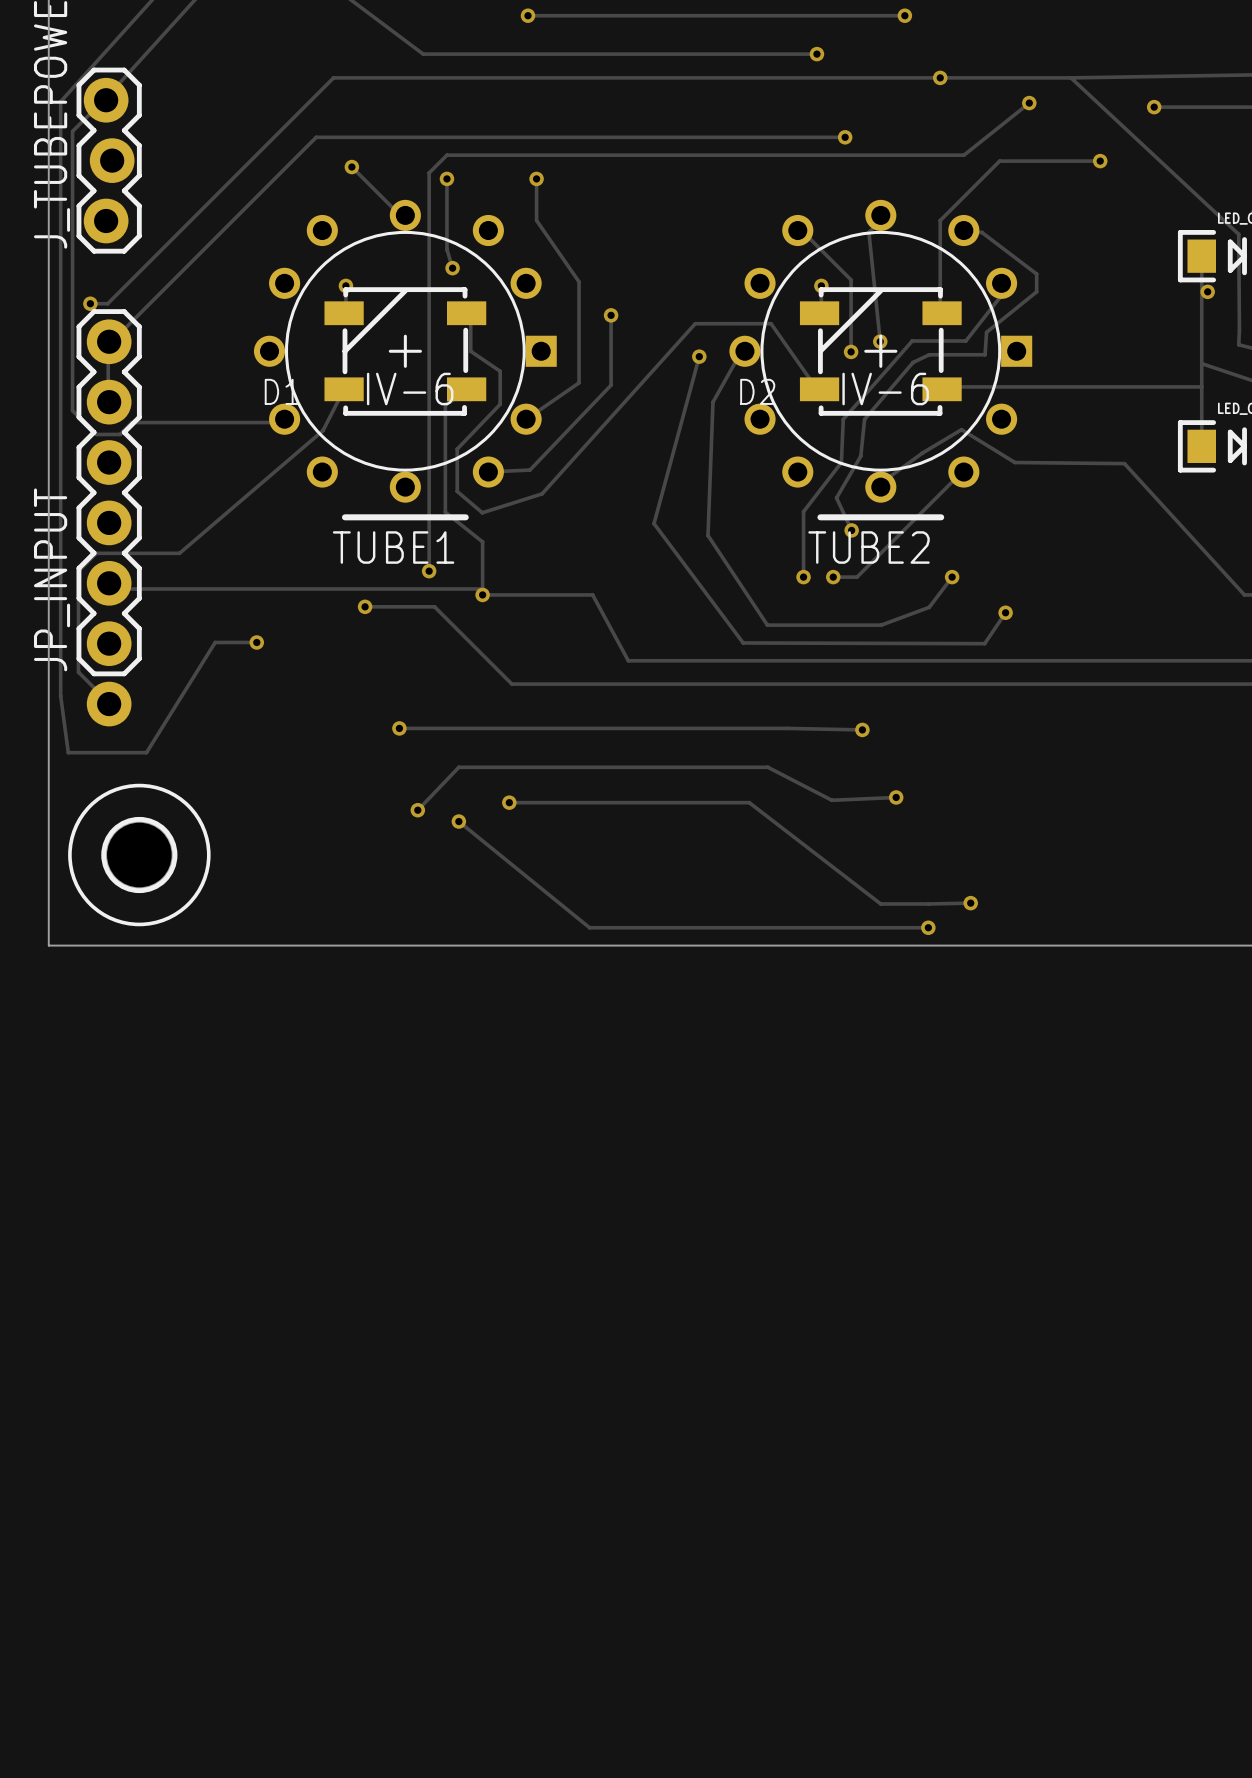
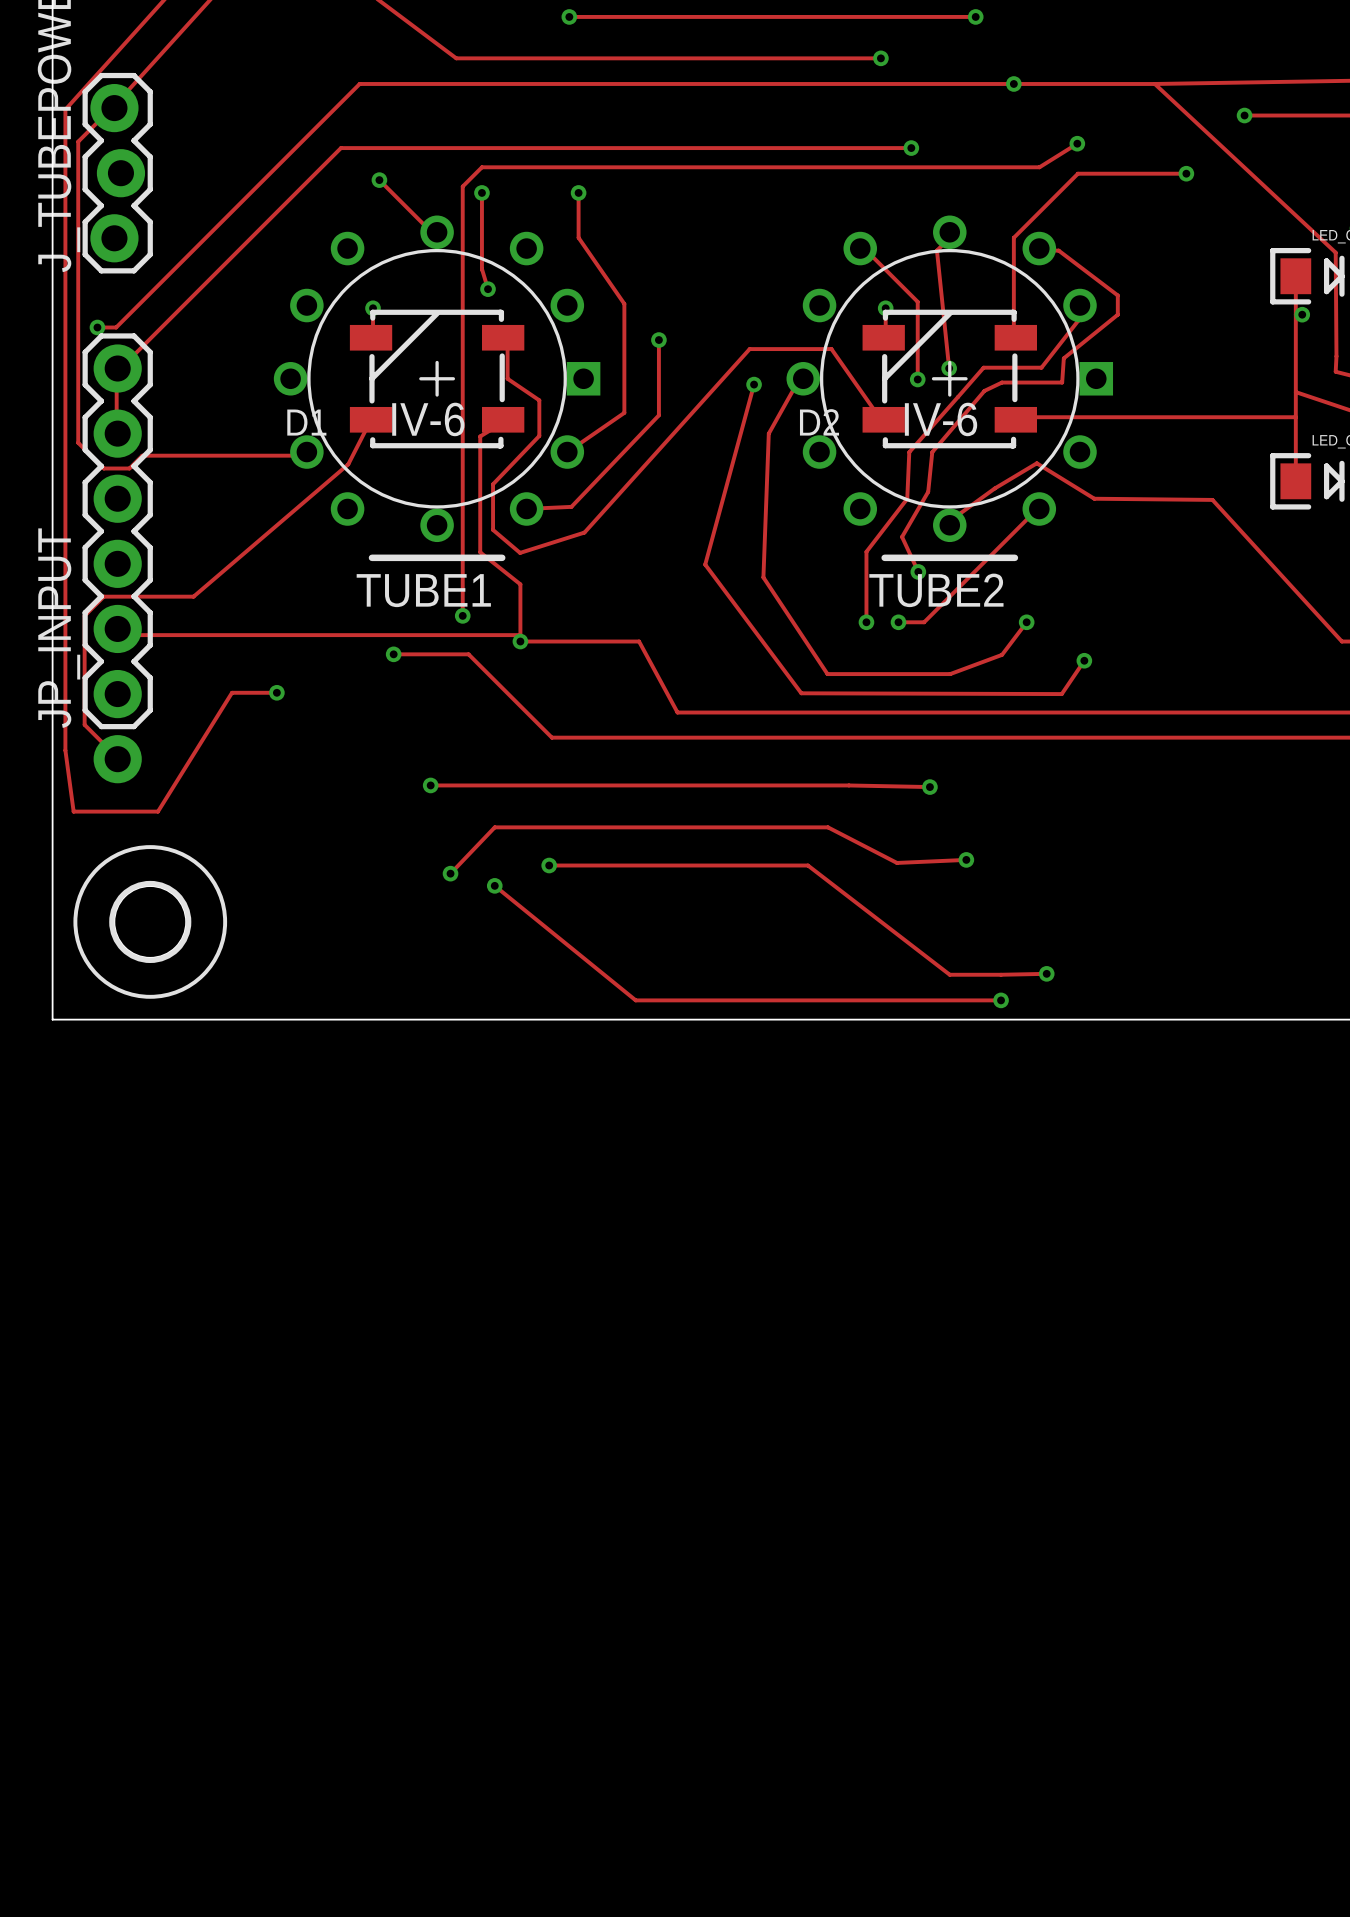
track: (1029, 103) (964, 155) -> (1077, 143) (1039, 167)
via position: (1029, 103) -> (1077, 143)

